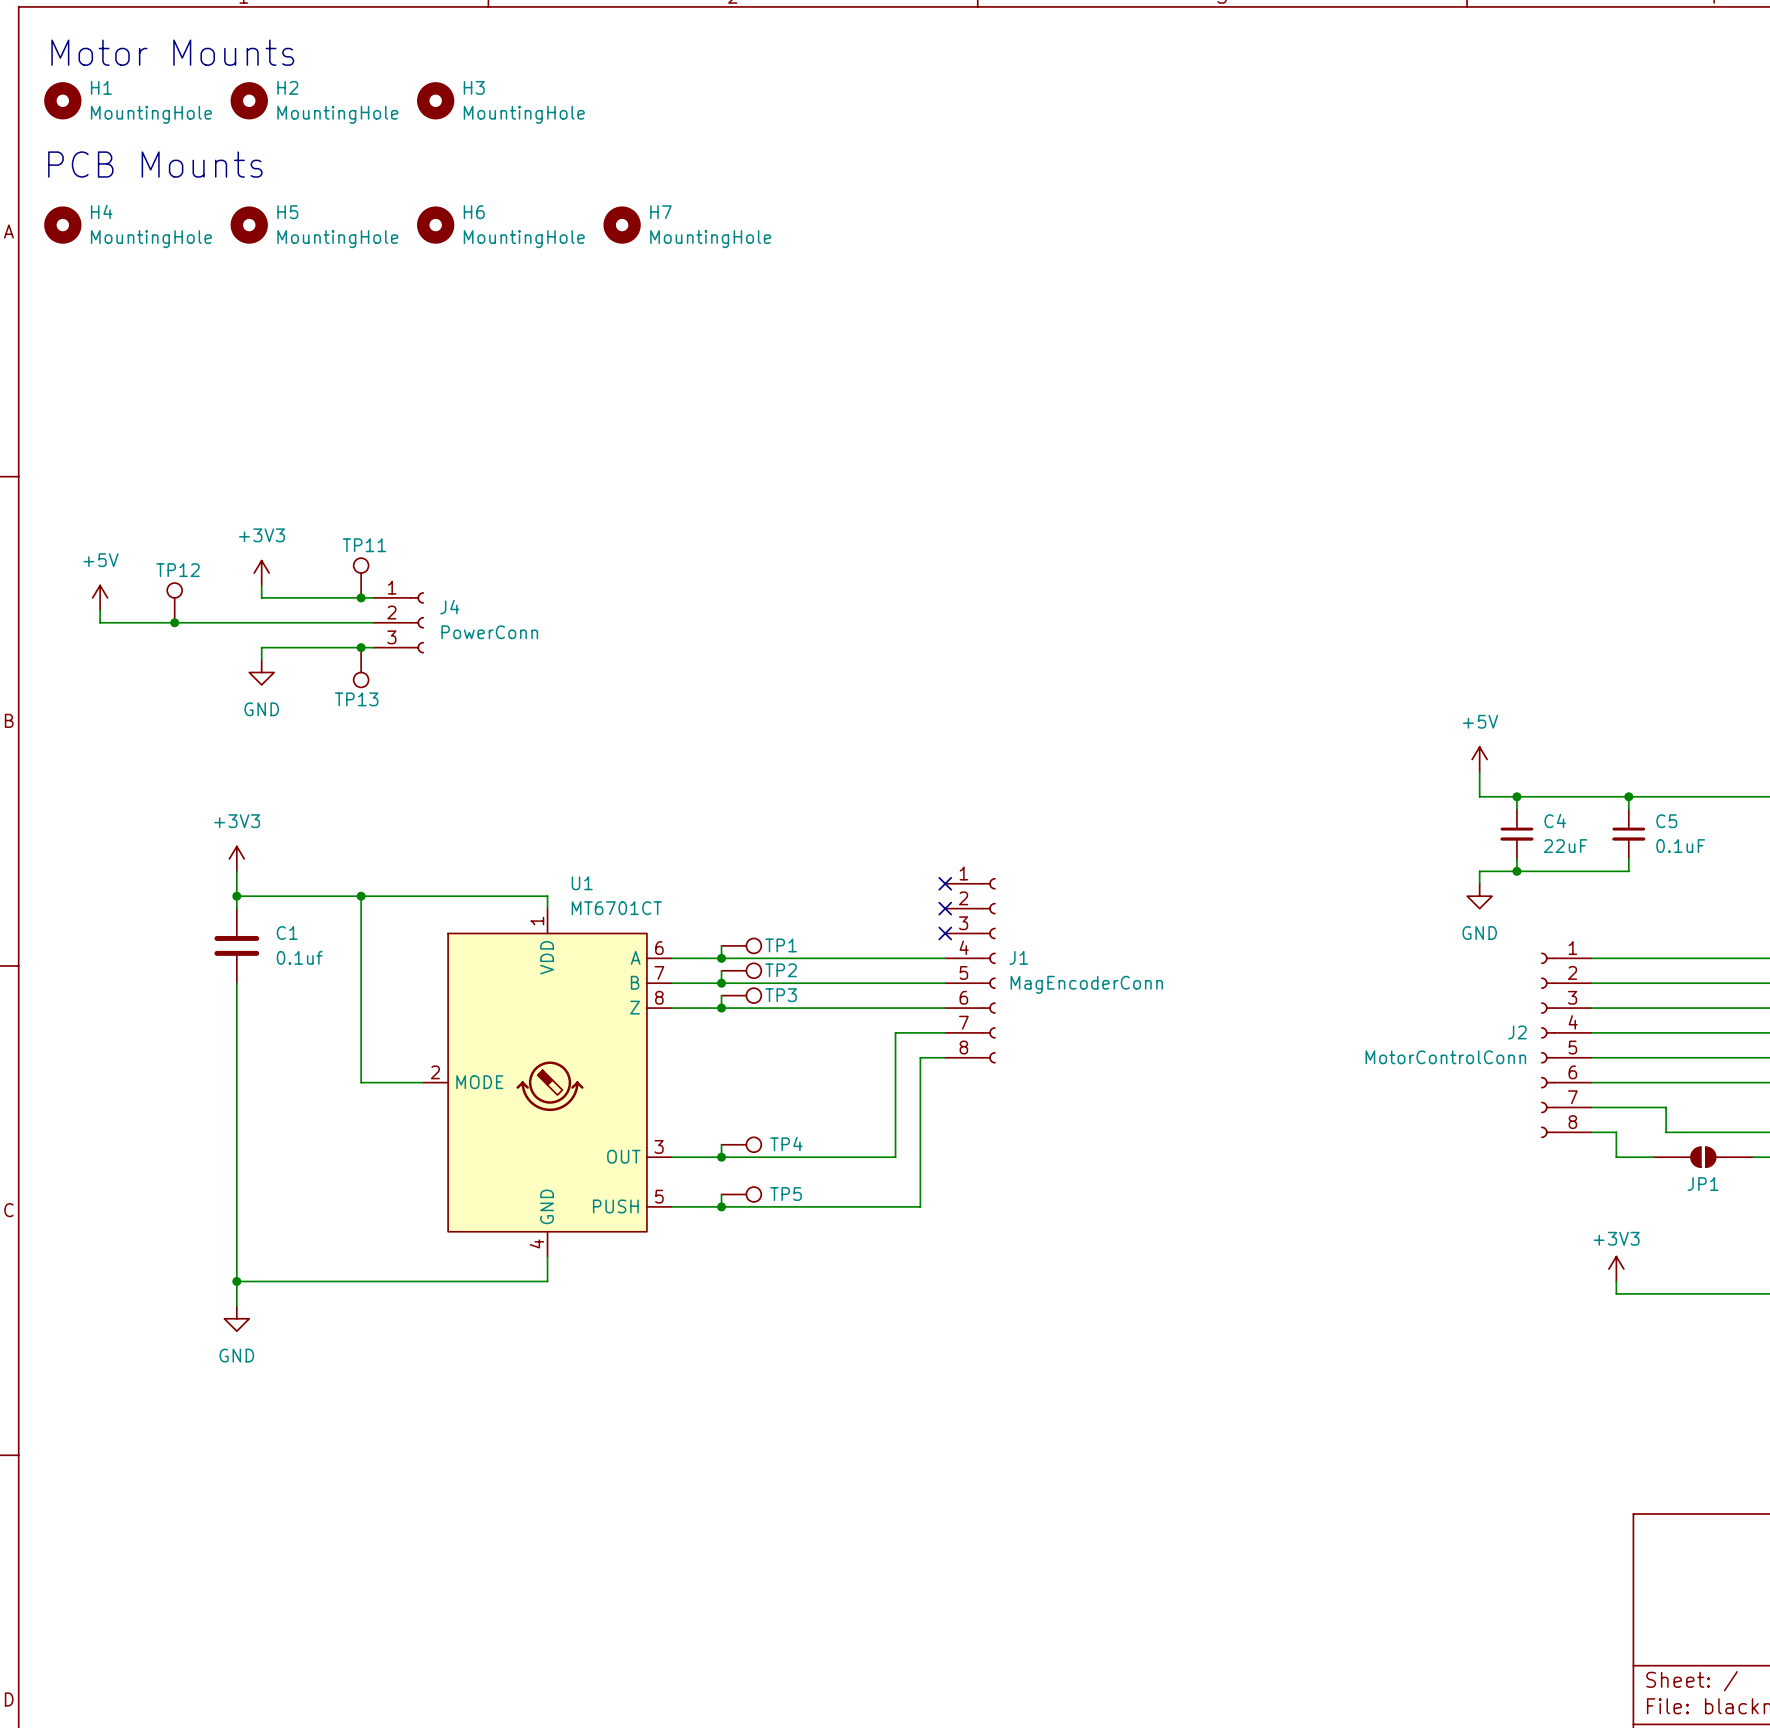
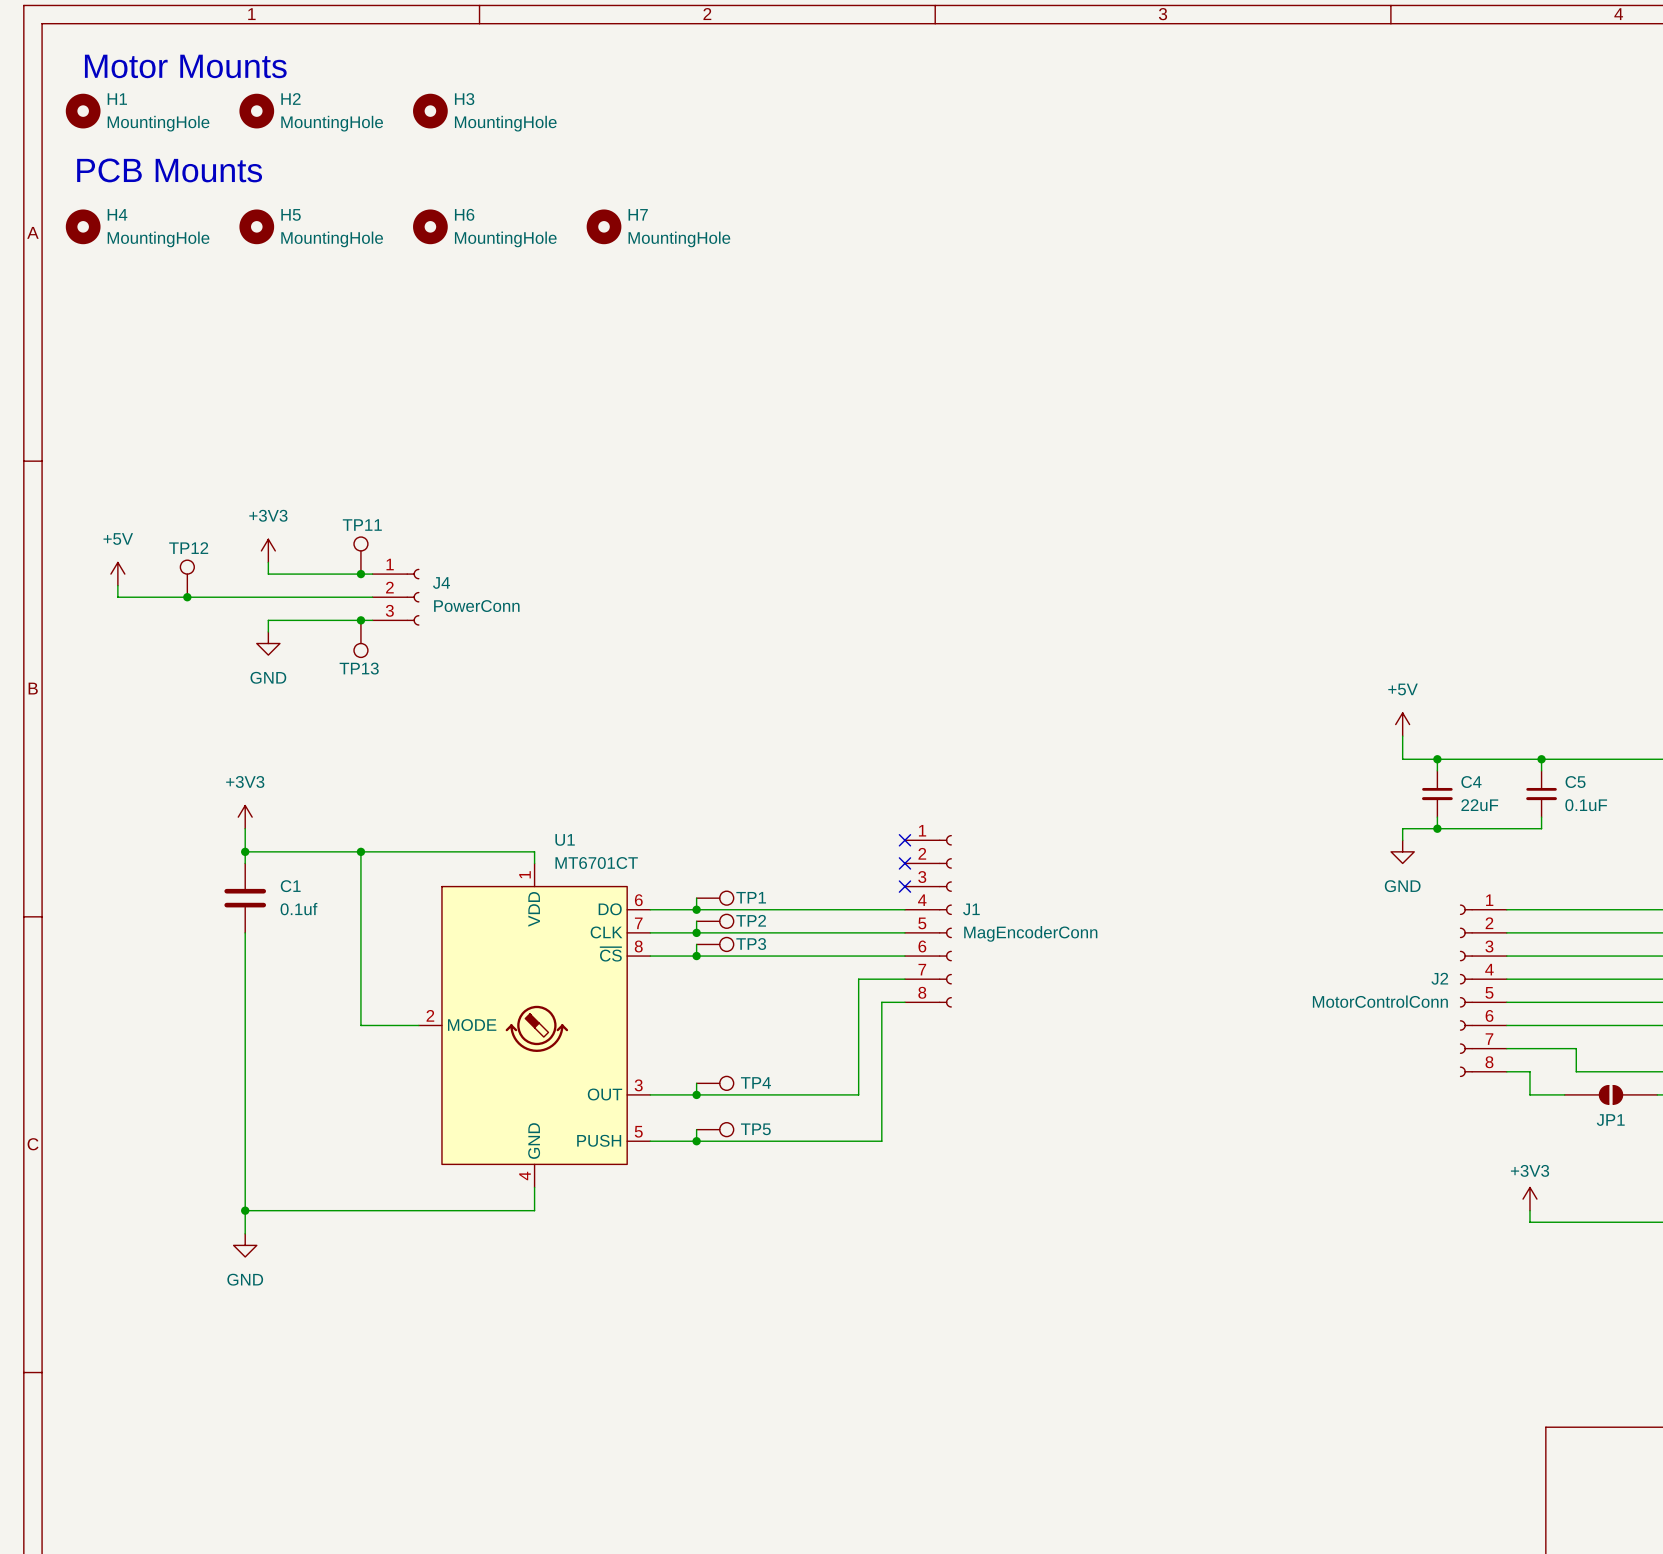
U1 pin name: A (635, 957) -> DO (610, 909)
U1 pin name: B (635, 982) -> CLK (606, 932)
U1 pin name: Z (635, 1007) -> ~{CS} (610, 954)

